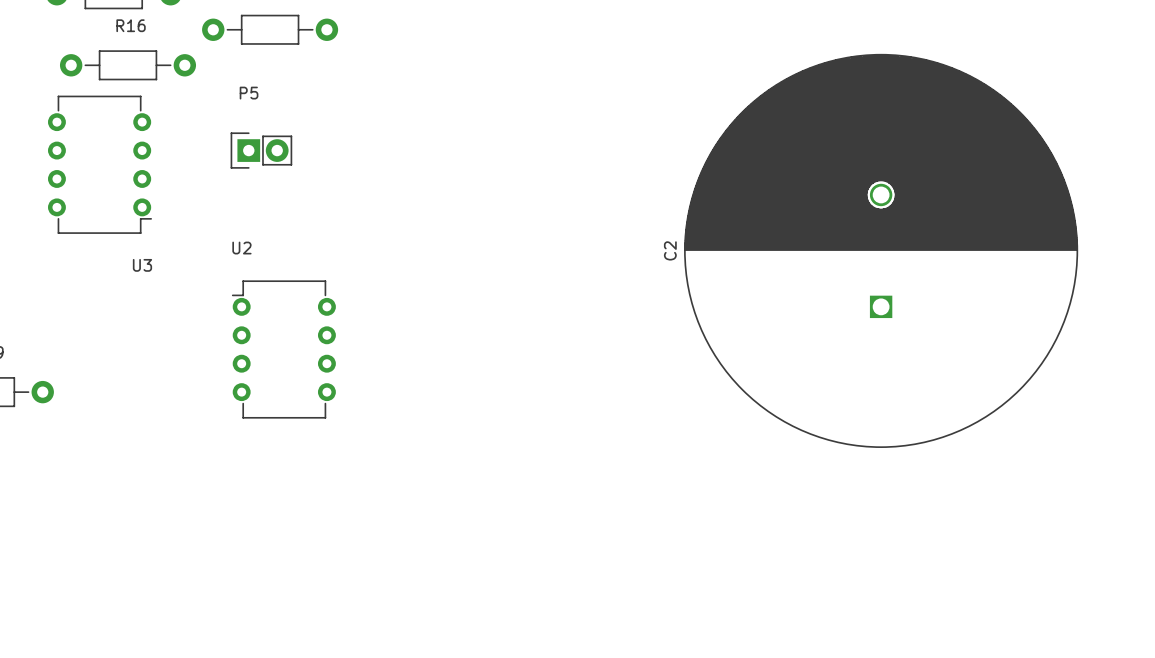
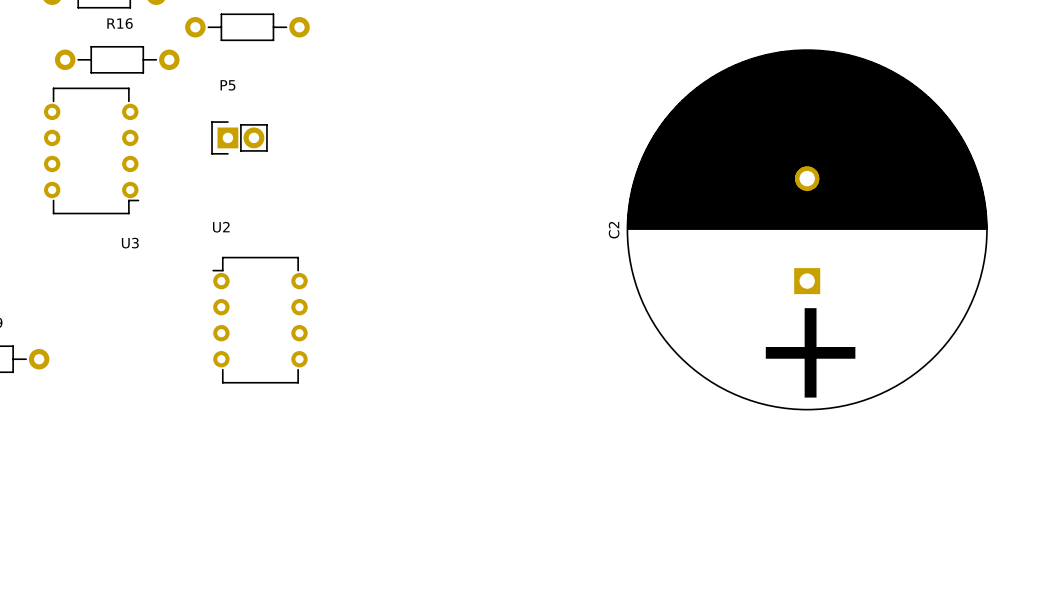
C2 footprint: [684, 53, 1079, 448] -> [626, 49, 988, 411]

